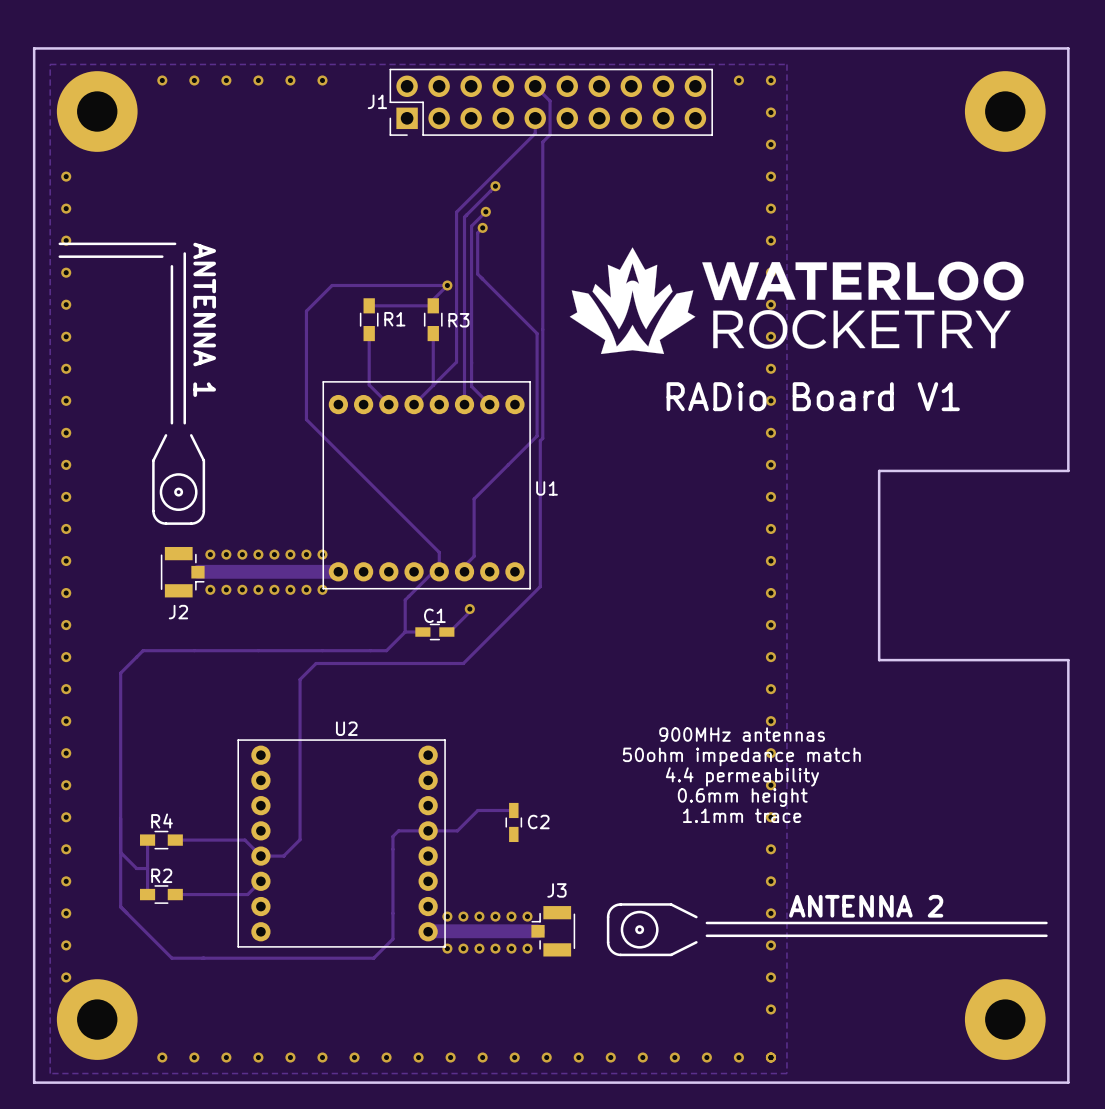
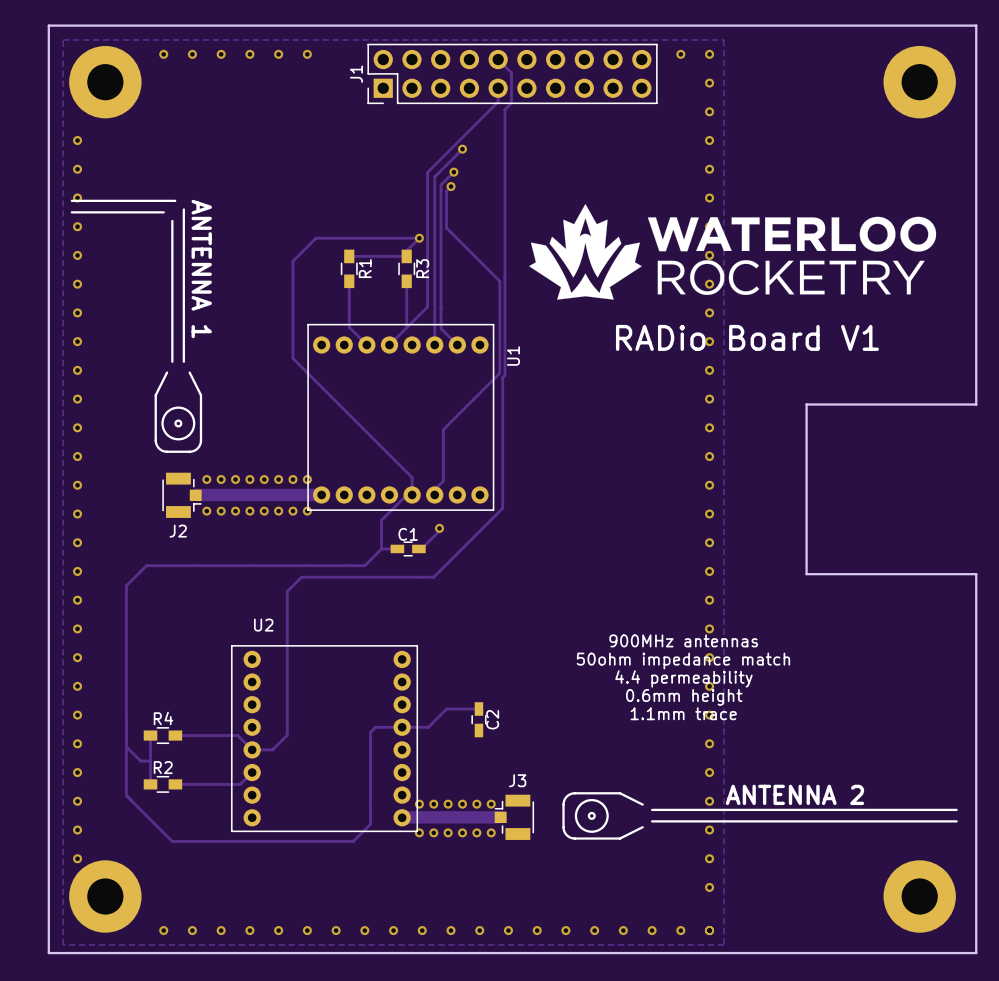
J1 name rotation: 0° (377, 101) -> 90° counterclockwise (356, 74)
R1 name rotation: 0° (394, 319) -> 90° counterclockwise (365, 268)
R3 name rotation: 0° (458, 320) -> 90° counterclockwise (422, 268)
U1 name rotation: 0° (547, 488) -> 90° counterclockwise (513, 356)
U1 name position: U1 (547, 488) -> U1 (513, 356)
U2 name position: U2 (346, 728) -> U2 (263, 625)
C2 name rotation: 0° (538, 822) -> 90° counterclockwise (492, 719)

